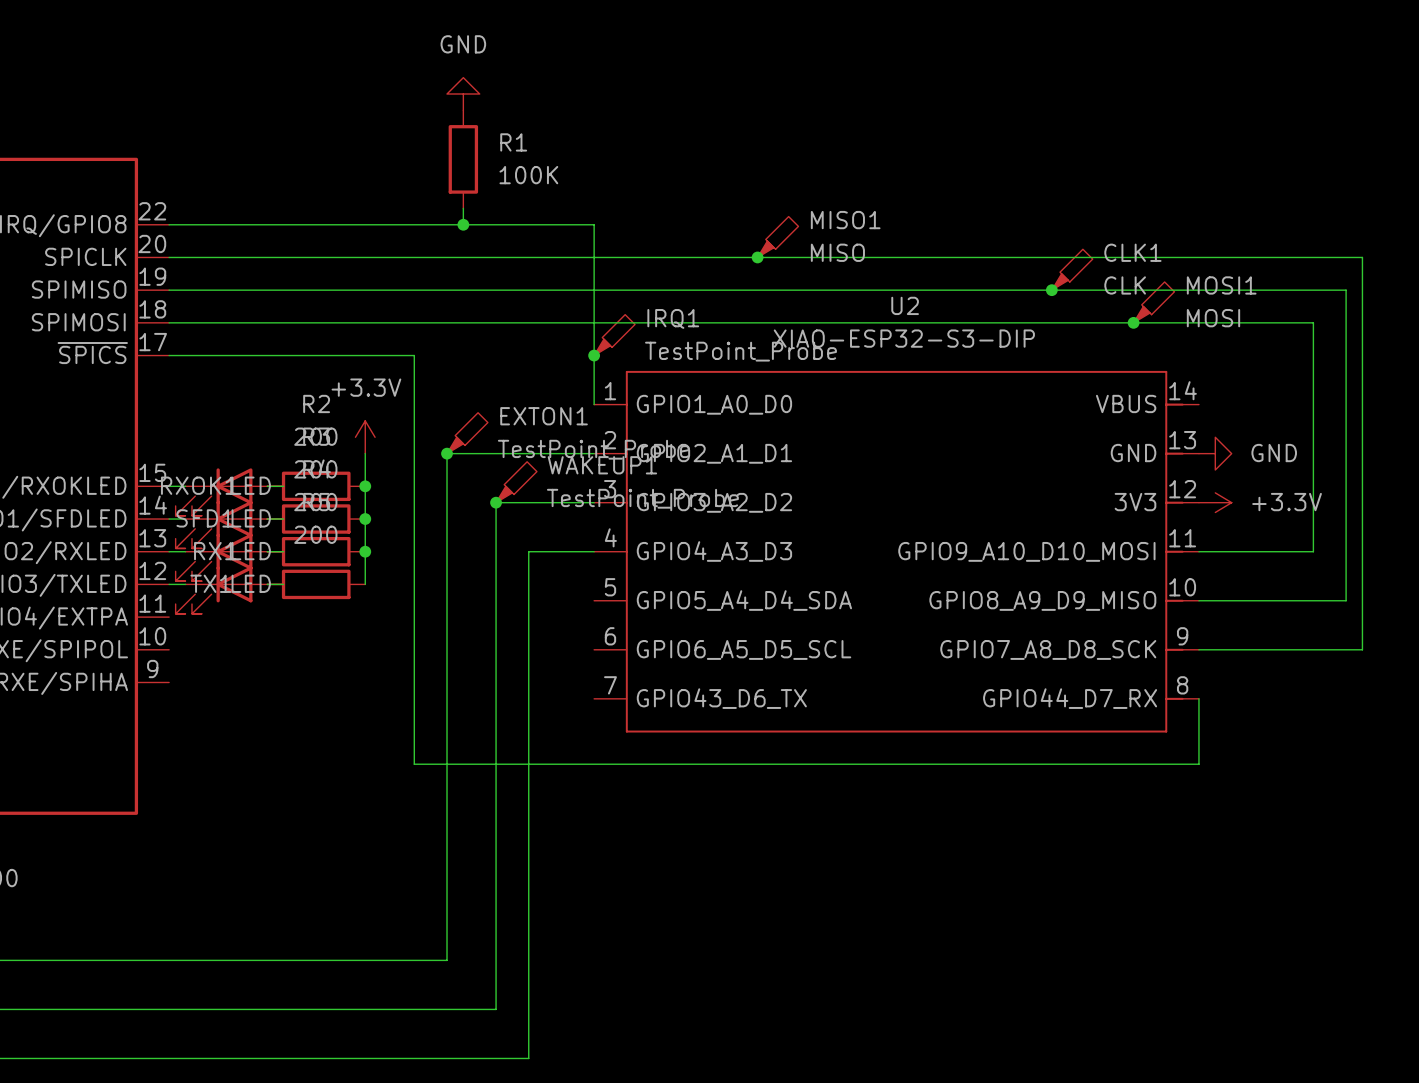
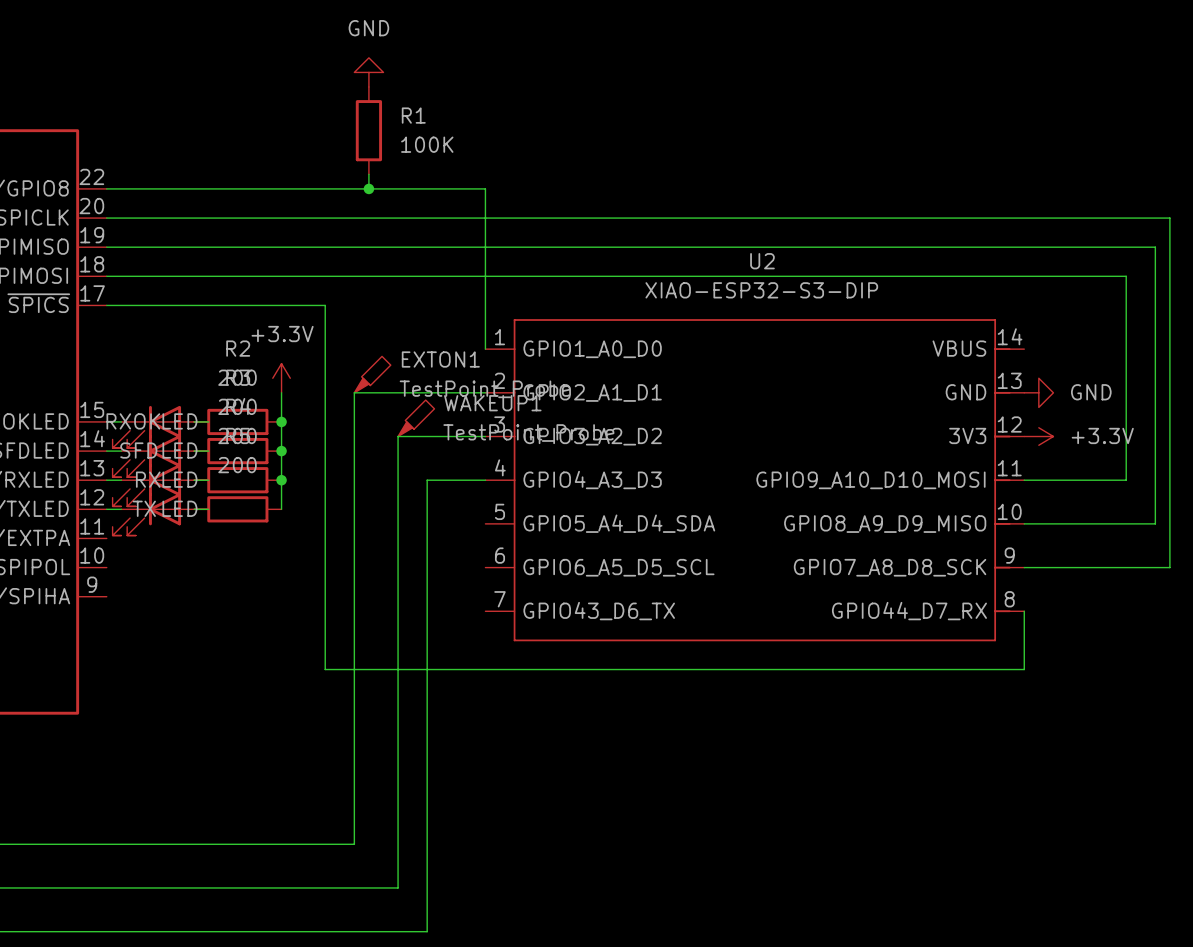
MISO1: MISO (778, 237) -> none
junction: (757, 257) -> none
CLK1: CLK (1072, 269) -> none
junction: (1051, 290) -> none
MOSI1: MOSI (1154, 302) -> none
junction: (1133, 322) -> none
IRQ1: TestPoint_Probe (614, 335) -> none
junction: (594, 355) -> none
junction: (447, 453) -> none
RXOK1 name: RXOK1 (198, 485) -> RXOK (133, 421)
junction: (496, 502) -> none
SFD1 name: SFD1 (205, 518) -> SFD (138, 450)
RX1 name: RX1 (215, 551) -> RX (148, 479)
TX1 name: TX1 (210, 583) -> TX (144, 508)

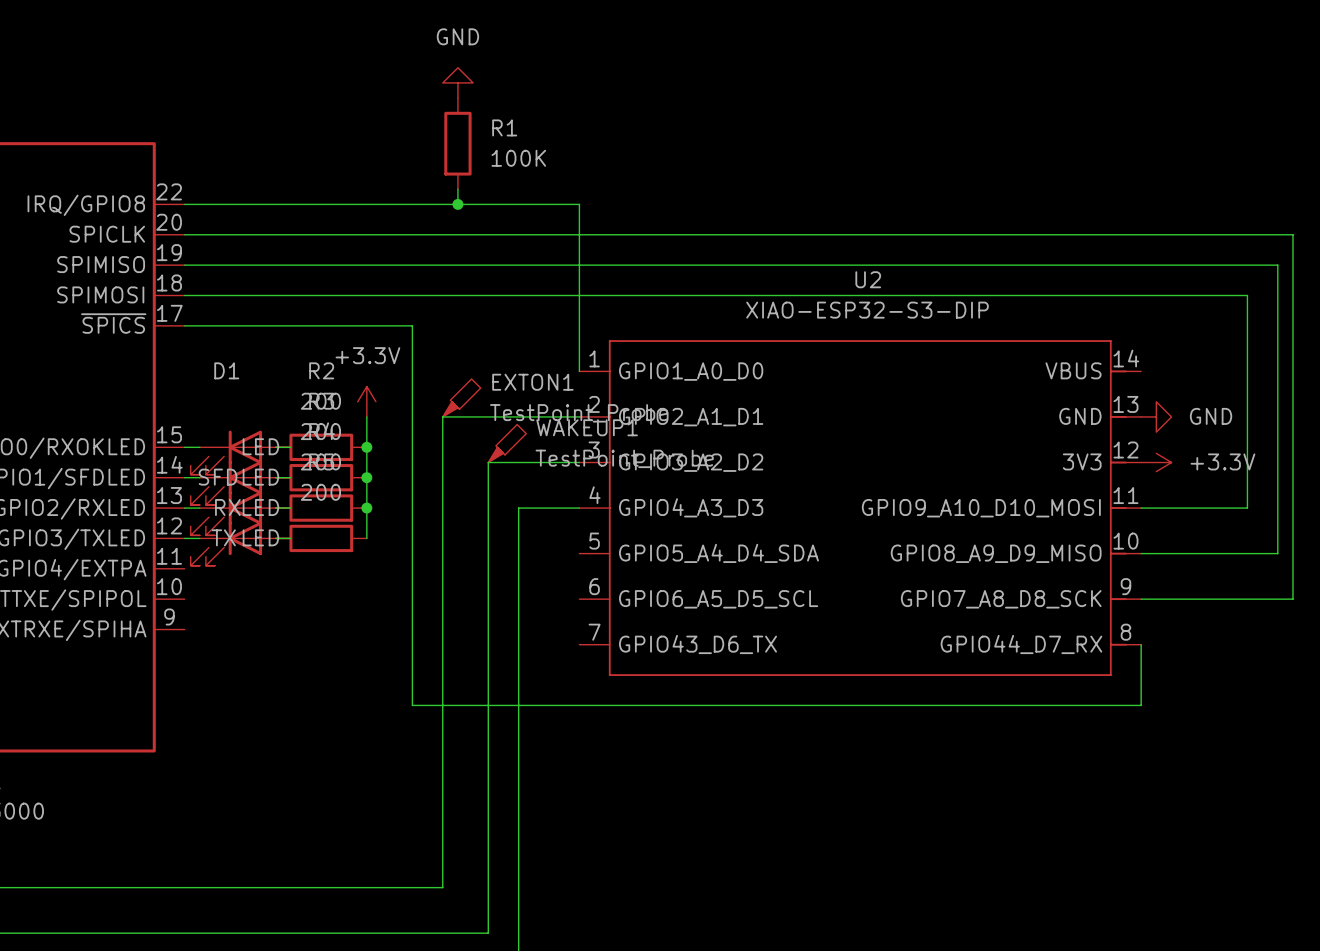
RXOK name: RXOK (133, 421) -> D1 (226, 370)

